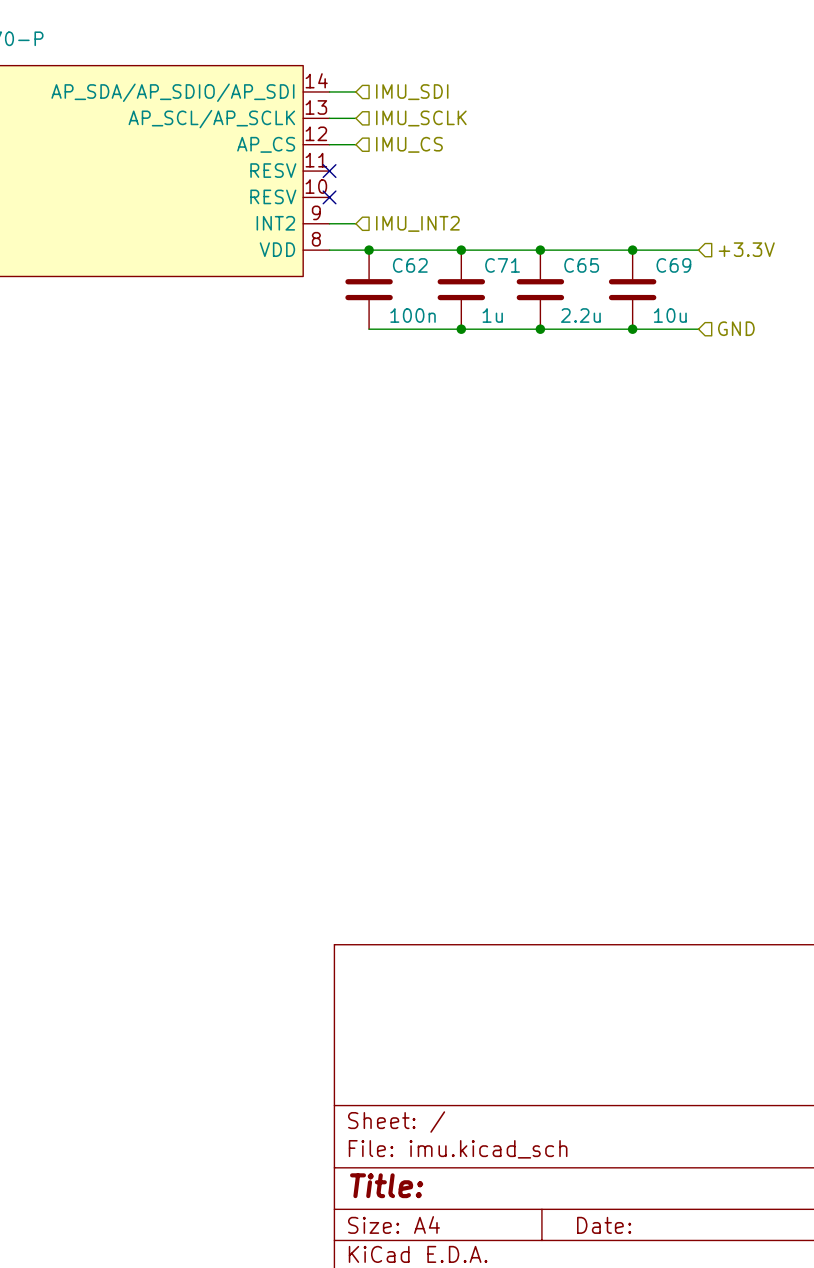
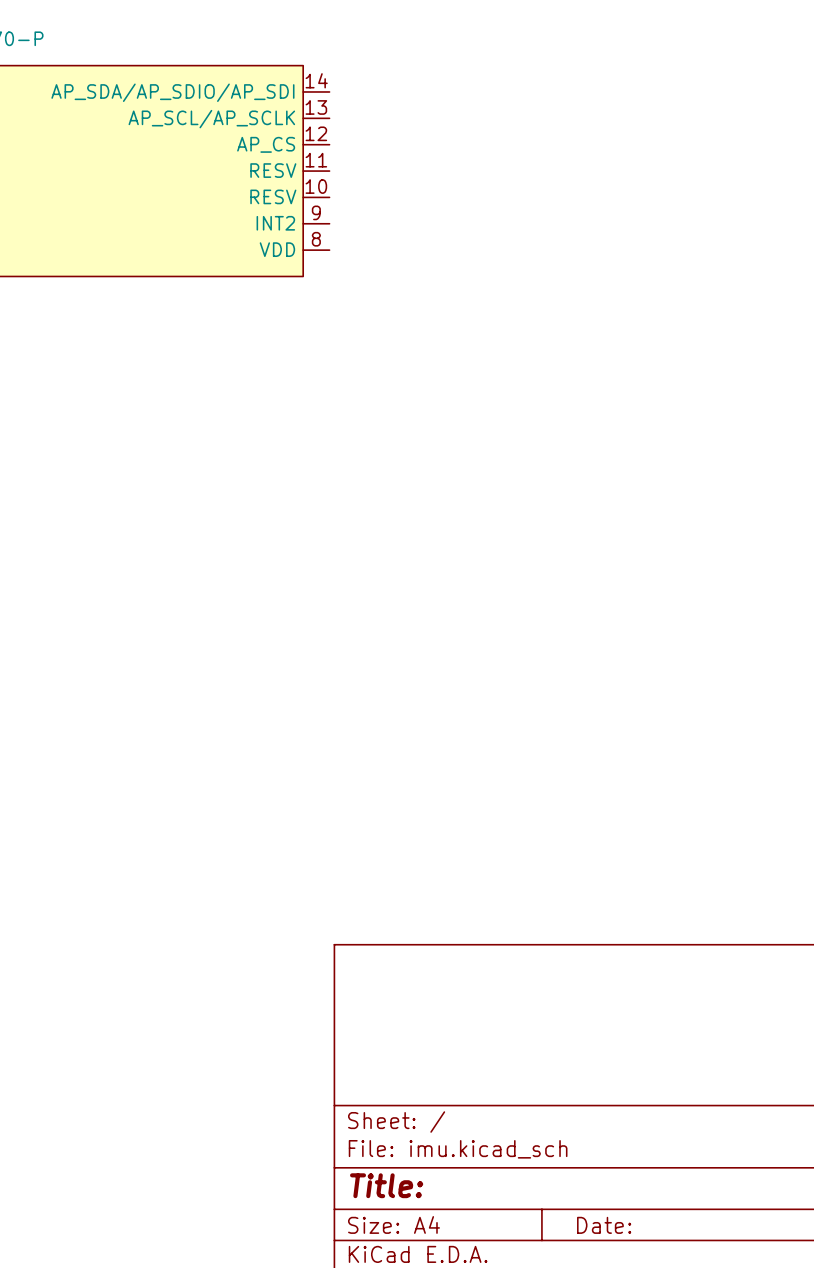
wire: (329, 91) (355, 91) -> none
hierarchical label: IMU_SDI (412, 92) -> none
wire: (329, 118) (355, 118) -> none
hierarchical label: IMU_SCLK (421, 118) -> none
wire: (329, 144) (355, 144) -> none
hierarchical label: IMU_CS (409, 144) -> none
no-connect mark: (329, 171) -> none
no-connect mark: (329, 197) -> none
wire: (329, 223) (355, 223) -> none
hierarchical label: IMU_INT2 (417, 223) -> none
hierarchical label: +3.3V (746, 249) -> none
wire: (329, 250) (698, 250) -> none
junction: (369, 250) -> none
junction: (461, 250) -> none
junction: (540, 250) -> none
junction: (632, 250) -> none
C62: 100n (369, 289) -> none
C71: 1u (461, 289) -> none
C65: 2.2u (540, 289) -> none
C69: 10u (632, 289) -> none
hierarchical label: GND (736, 328) -> none
wire: (369, 329) (698, 329) -> none
junction: (461, 329) -> none
junction: (540, 329) -> none
junction: (632, 329) -> none

